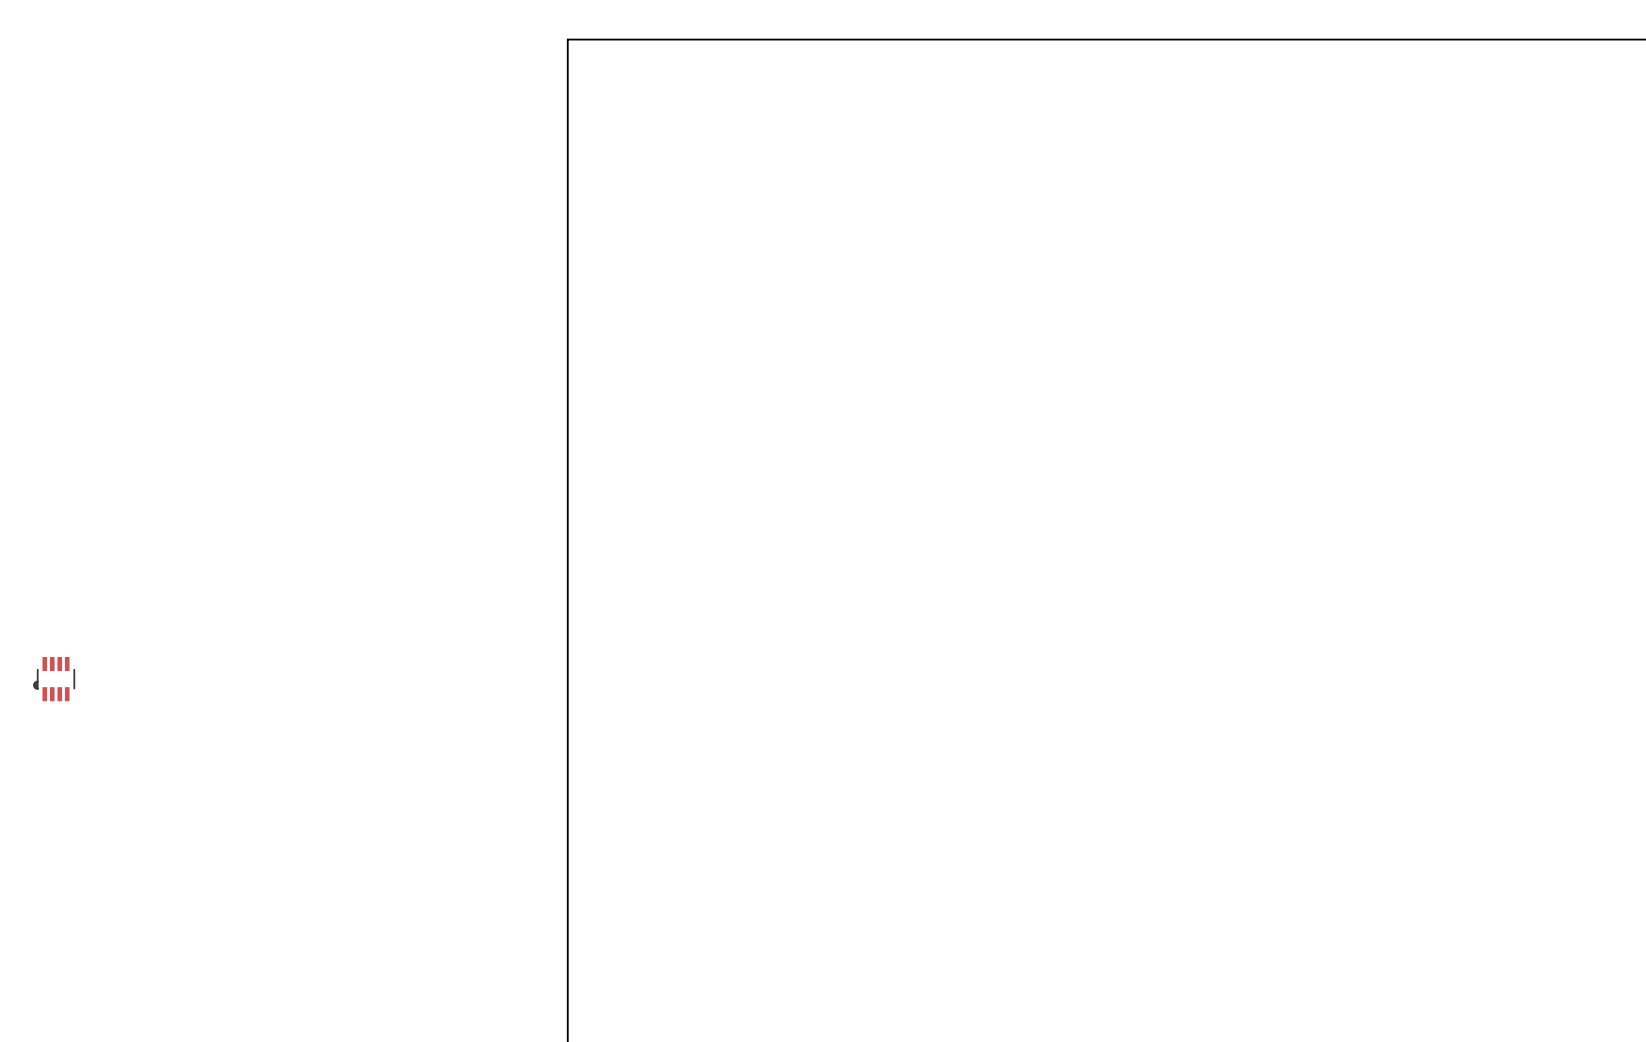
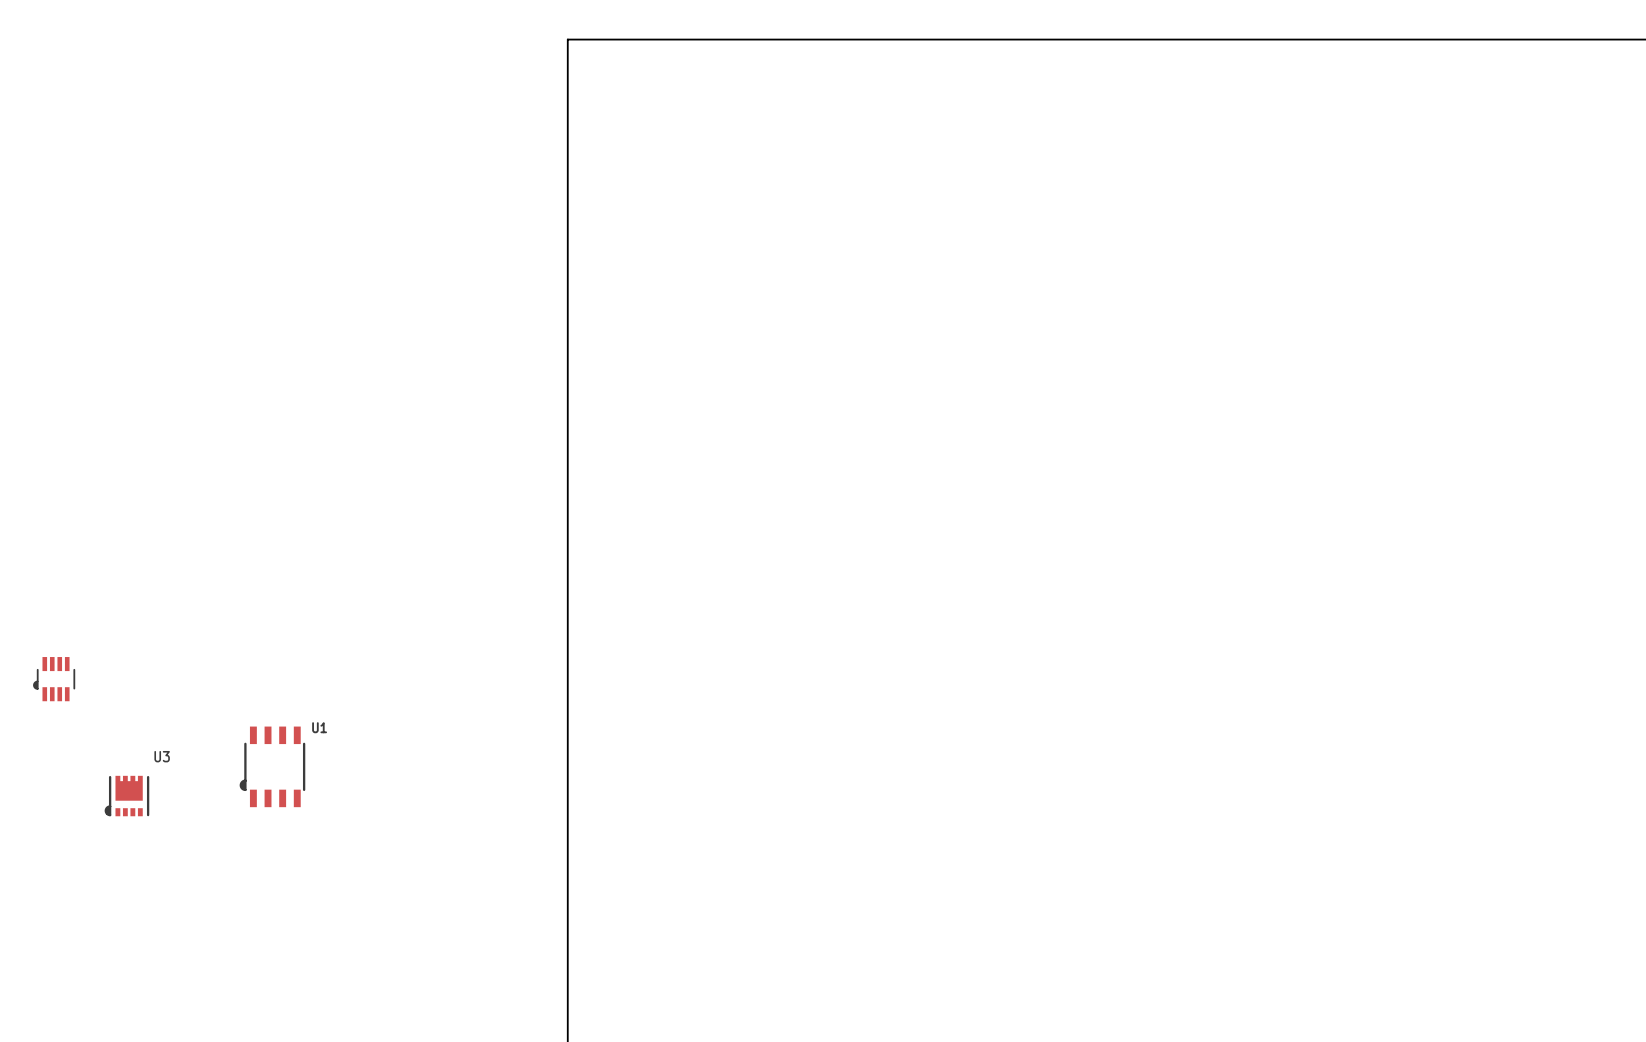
U1: none -> (272, 766)
U3: none -> (126, 796)

